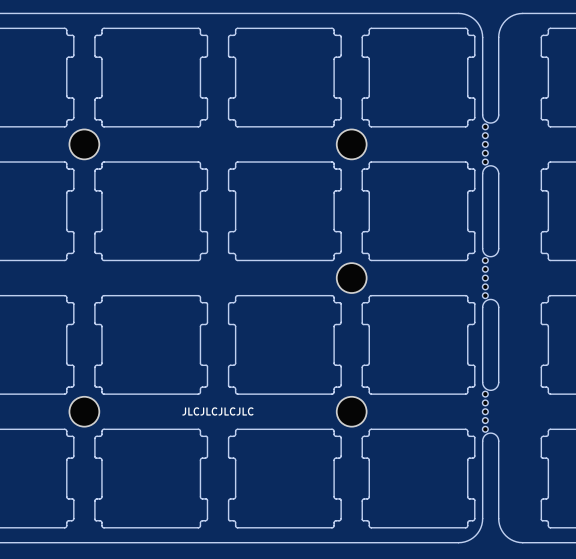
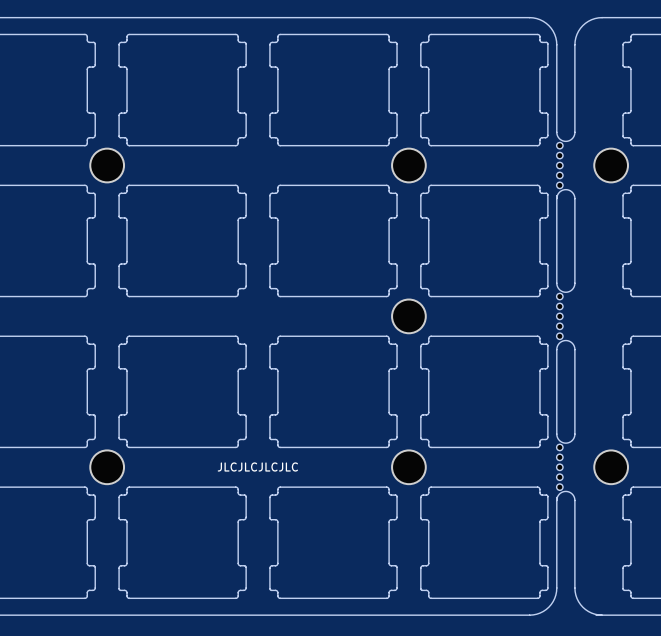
part: none -> (611, 165)
part: none -> (611, 467)

